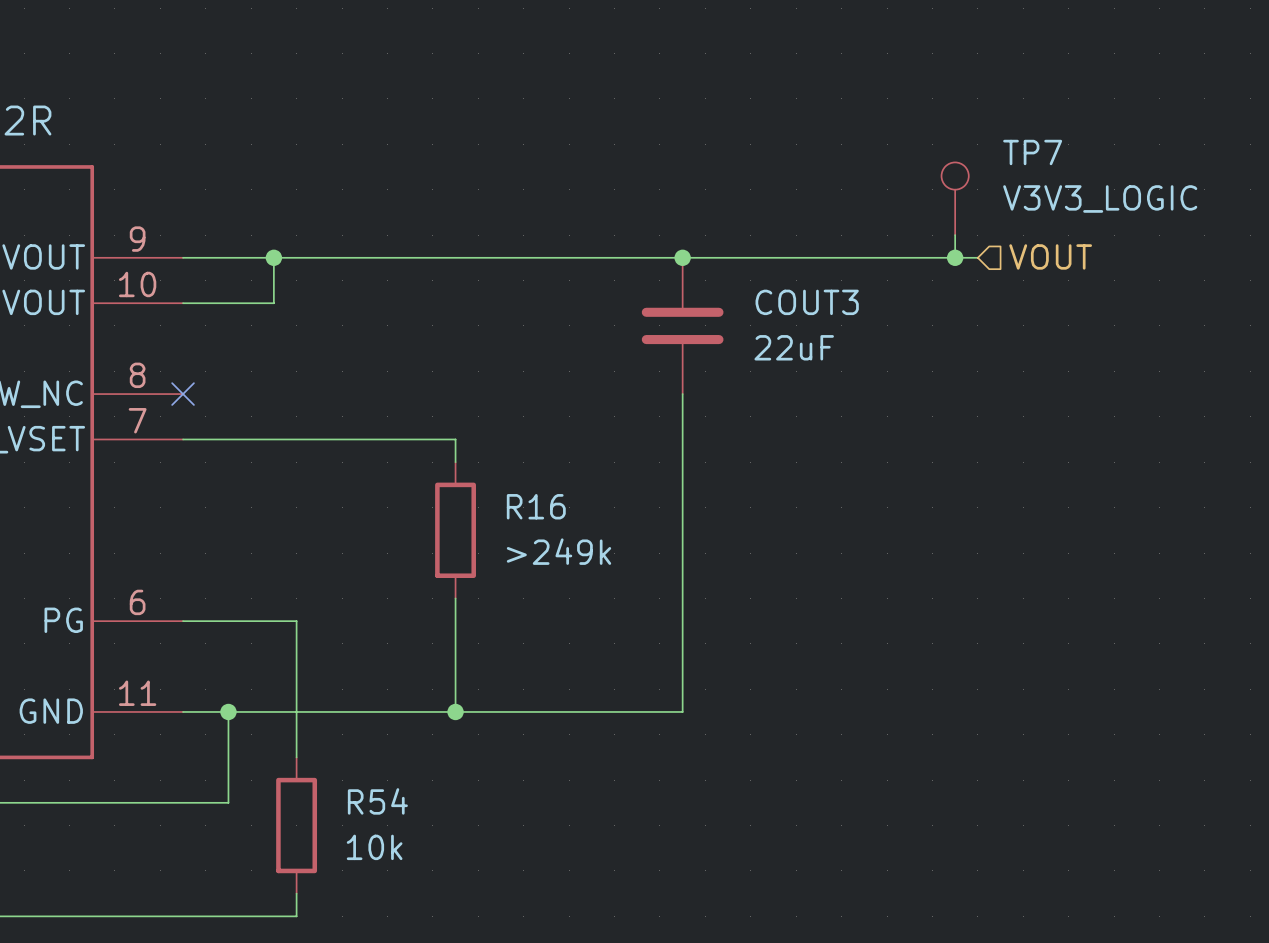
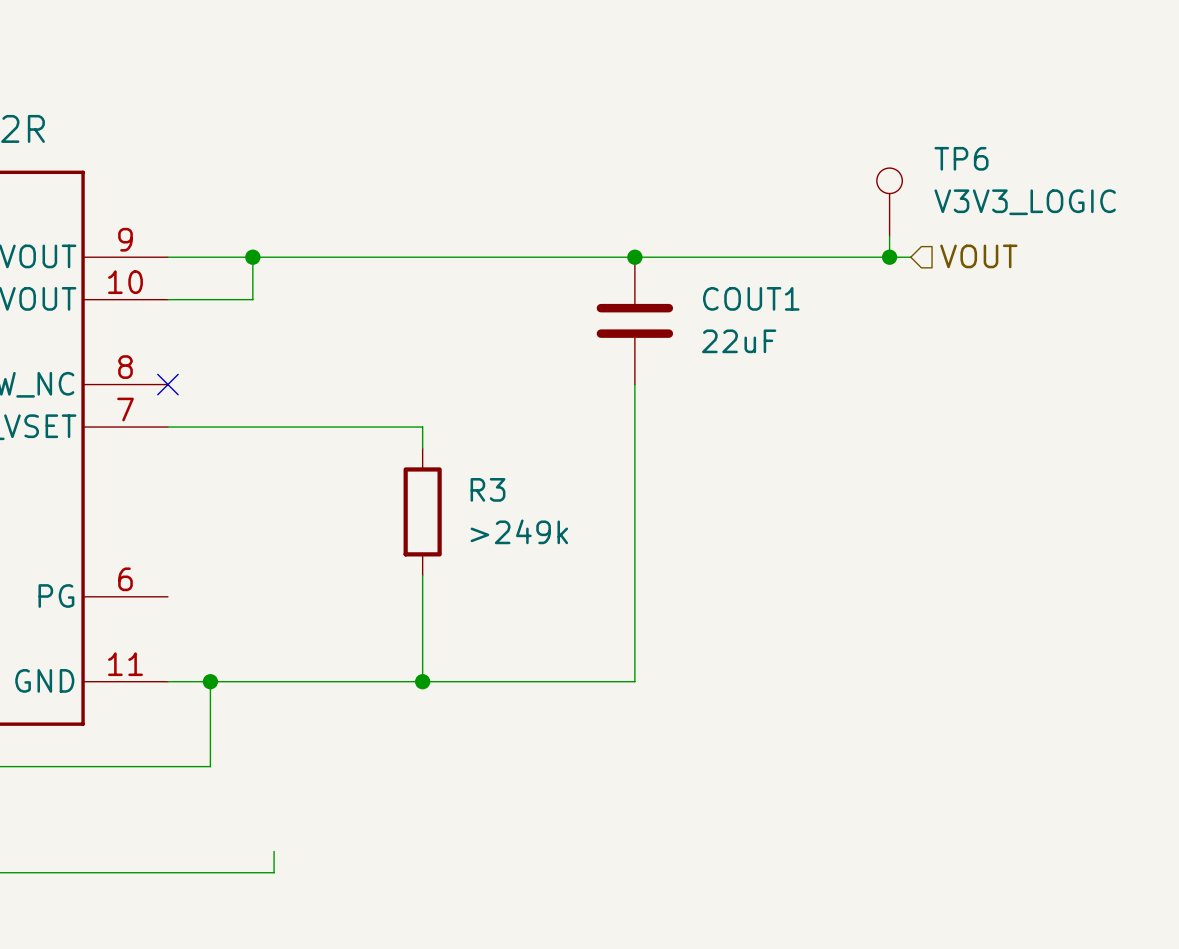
TP7 name: TP7 (1032, 152) -> TP6 (961, 158)
COUT3 name: COUT3 (807, 302) -> COUT1 (751, 298)
R16 name: R16 (536, 506) -> R3 (487, 489)
wire: (183, 621) (296, 621) (296, 757) -> none
R54: 10k (296, 825) -> none

